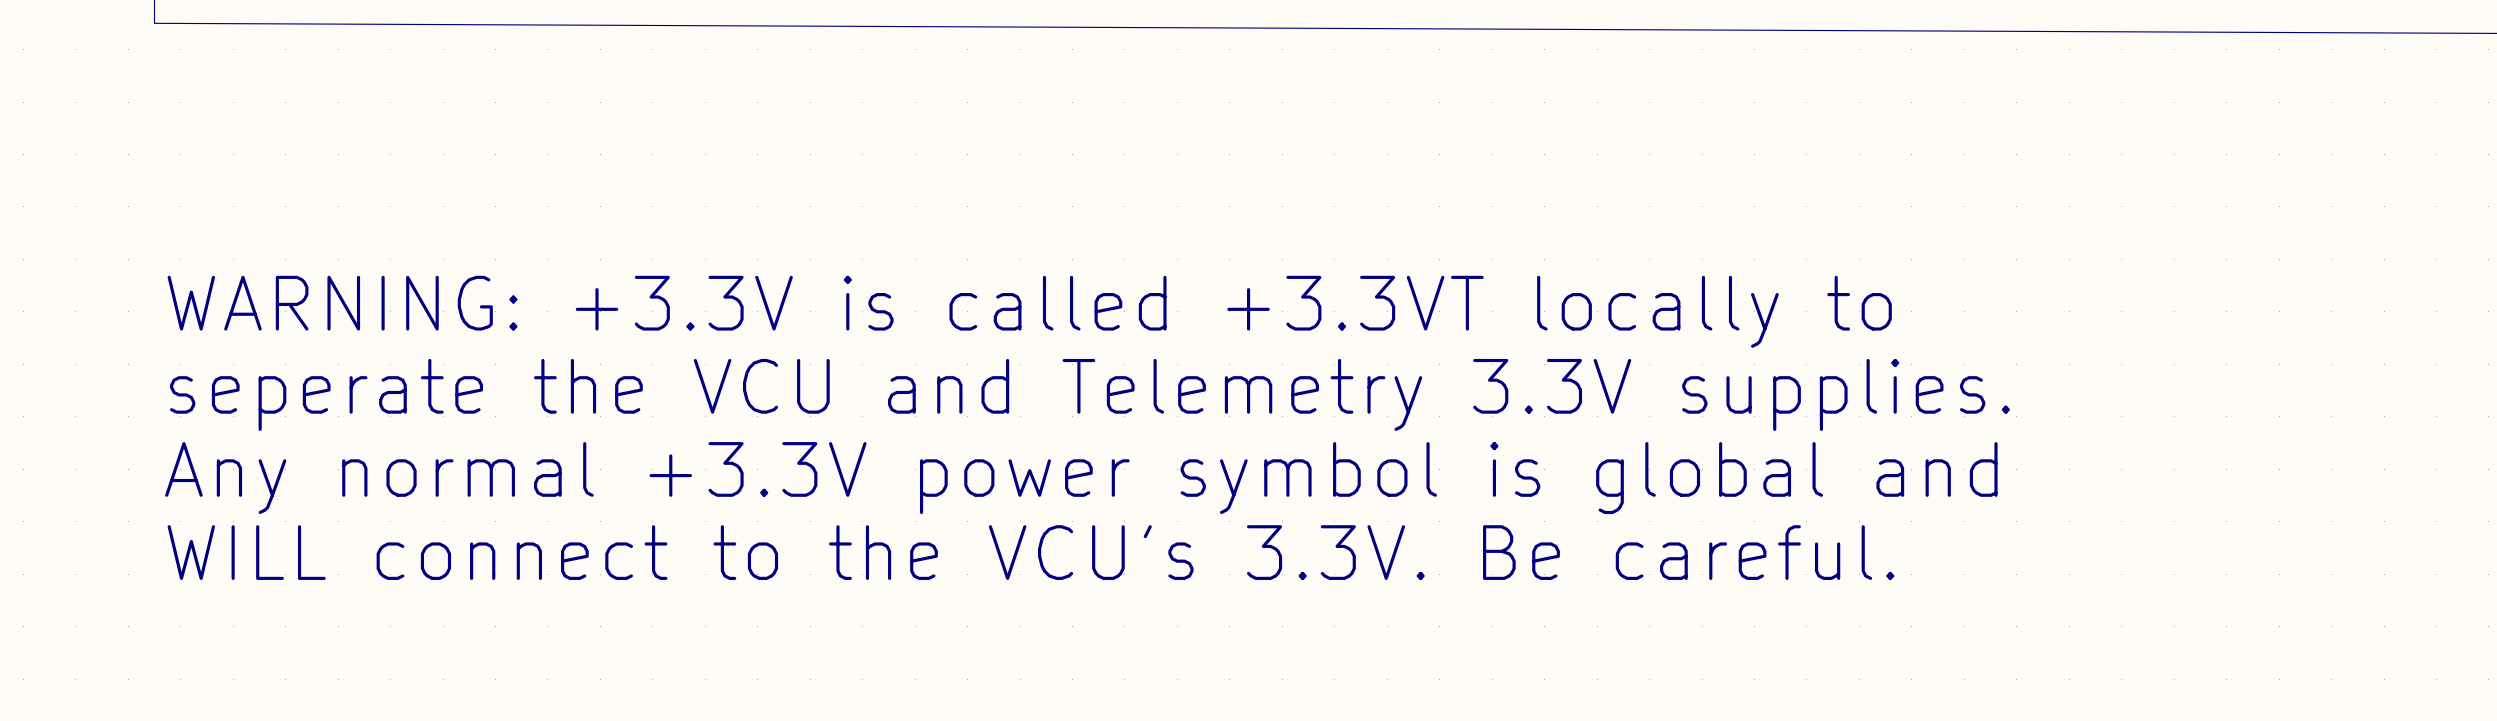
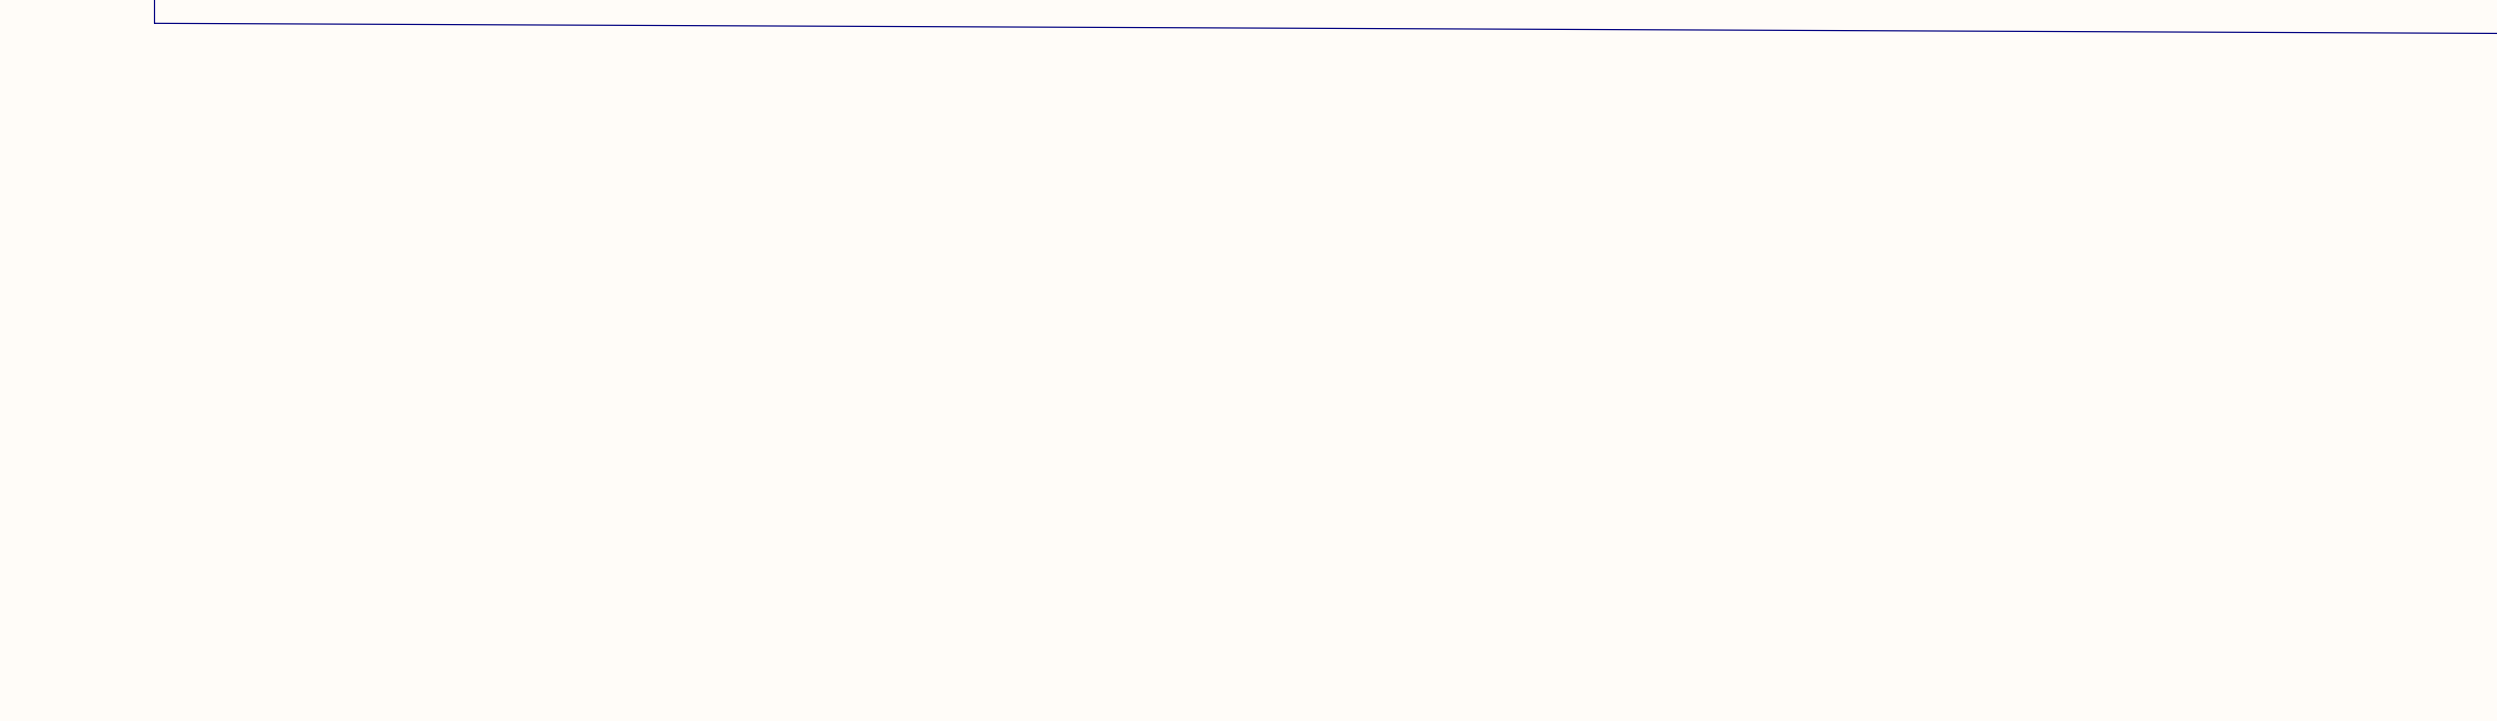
text: WARNING: +3.3V is called +3.3VT locally to (1029, 311) -> none
text: seperate the VCU and Telemetry 3.3V supplies. (1089, 394) -> none
text: Any normal +3.3V power symbol is global and (1081, 478) -> none
text: WILL connect to the VCU's 3.3V. Be careful. (1030, 552) -> none

